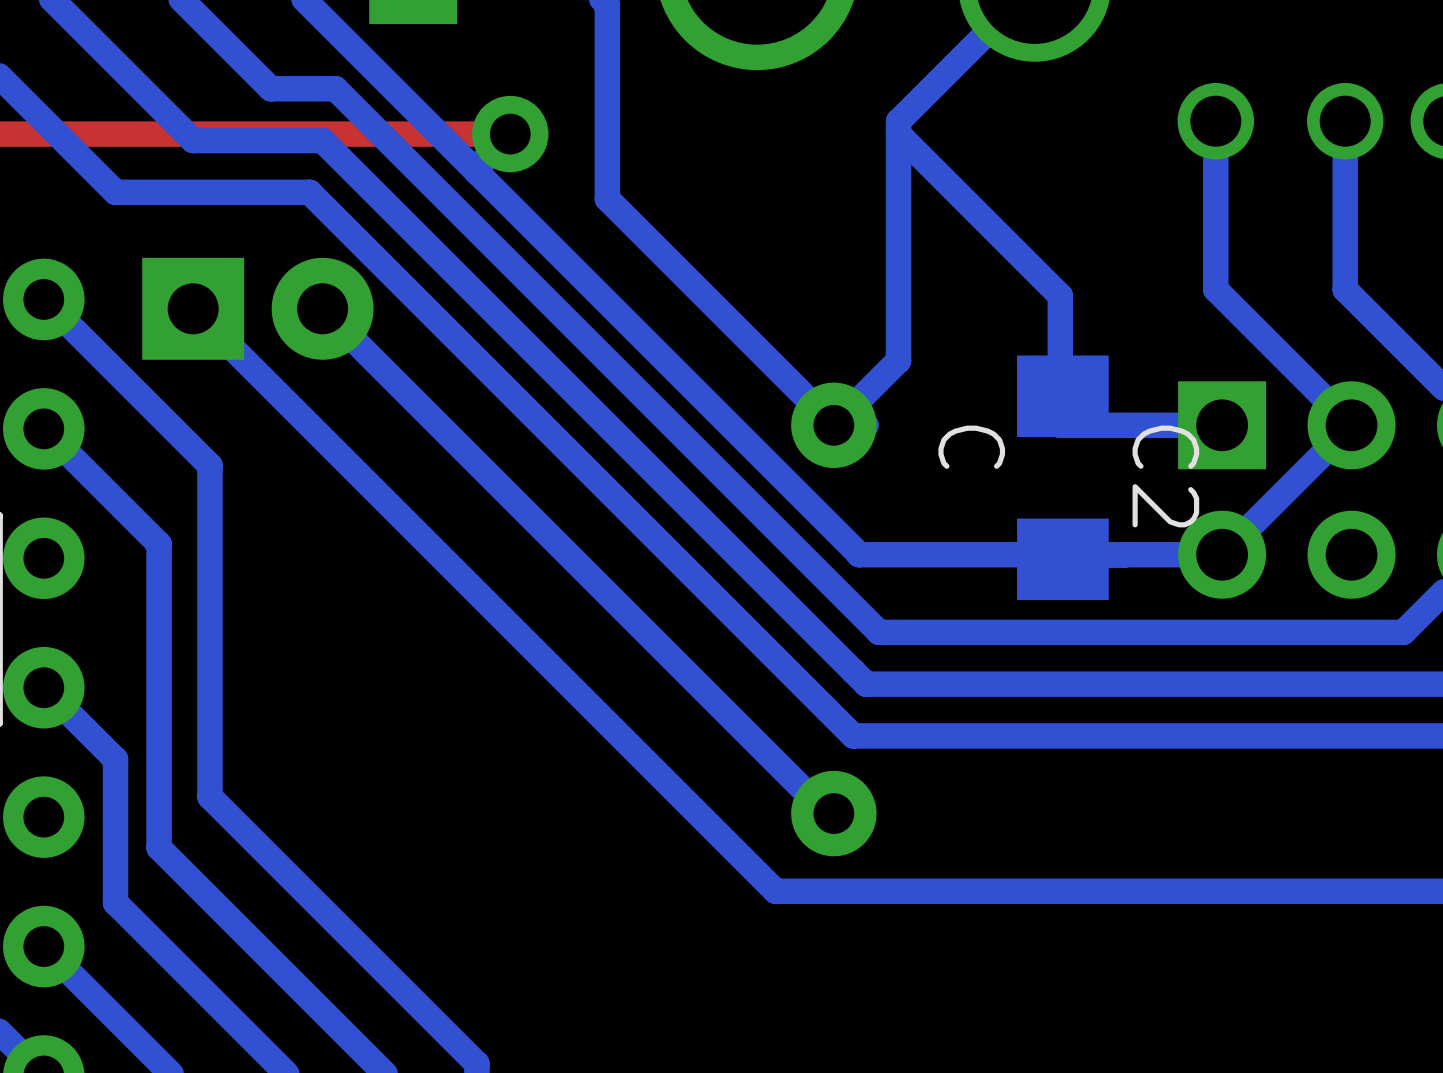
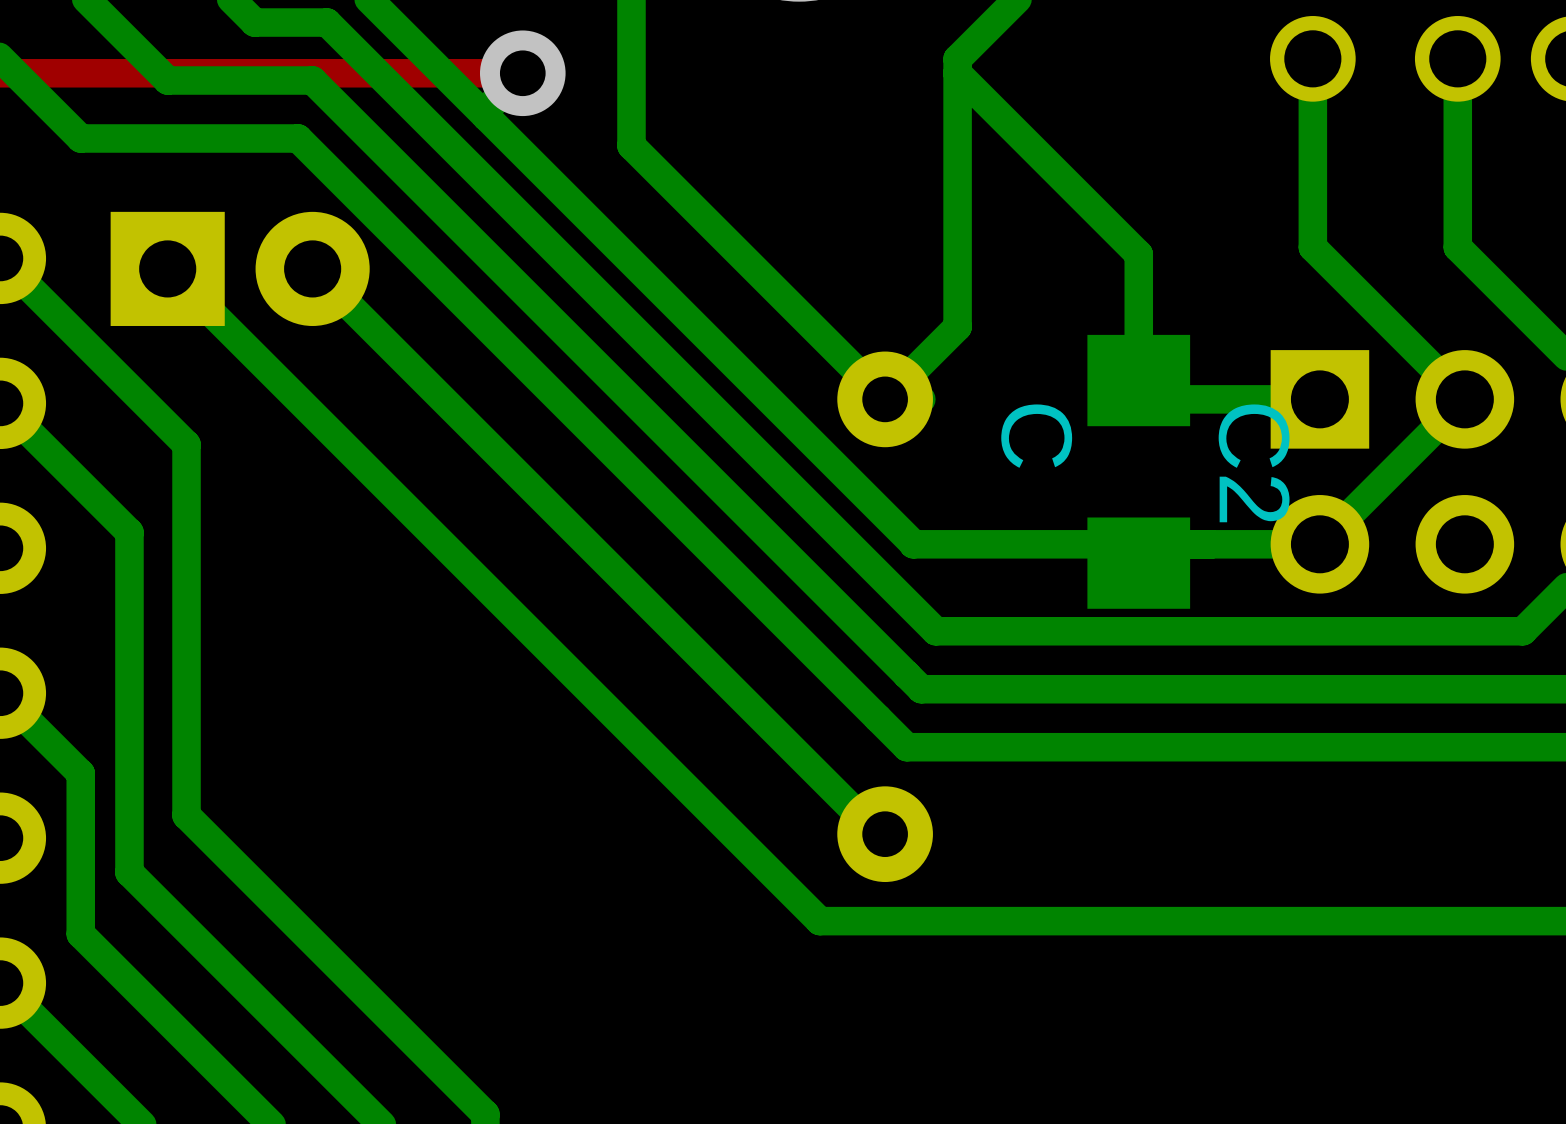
C2 position: (1062, 477) -> (1138, 471)

